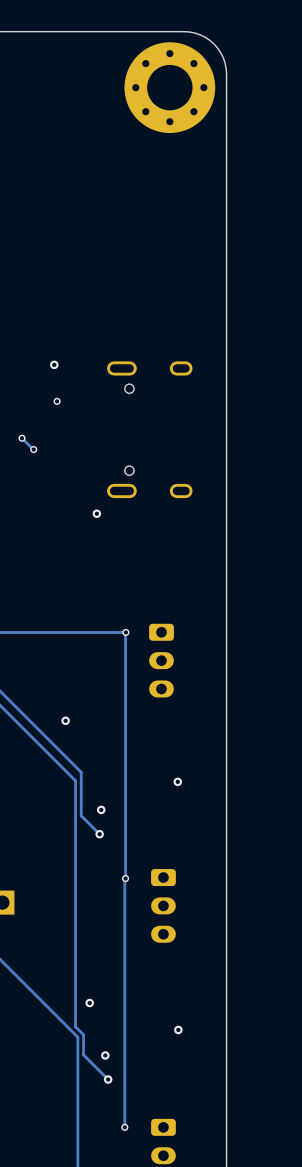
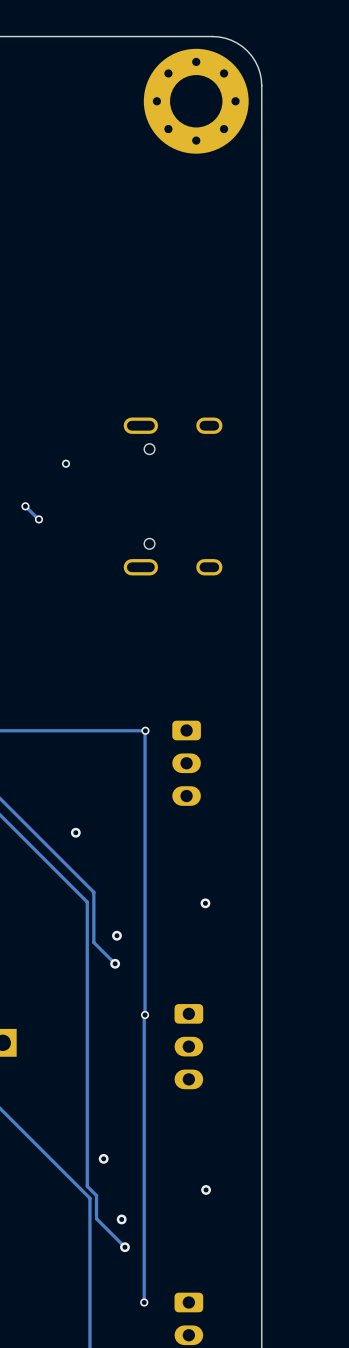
via: (54, 364) -> none
via: (96, 513) -> none

